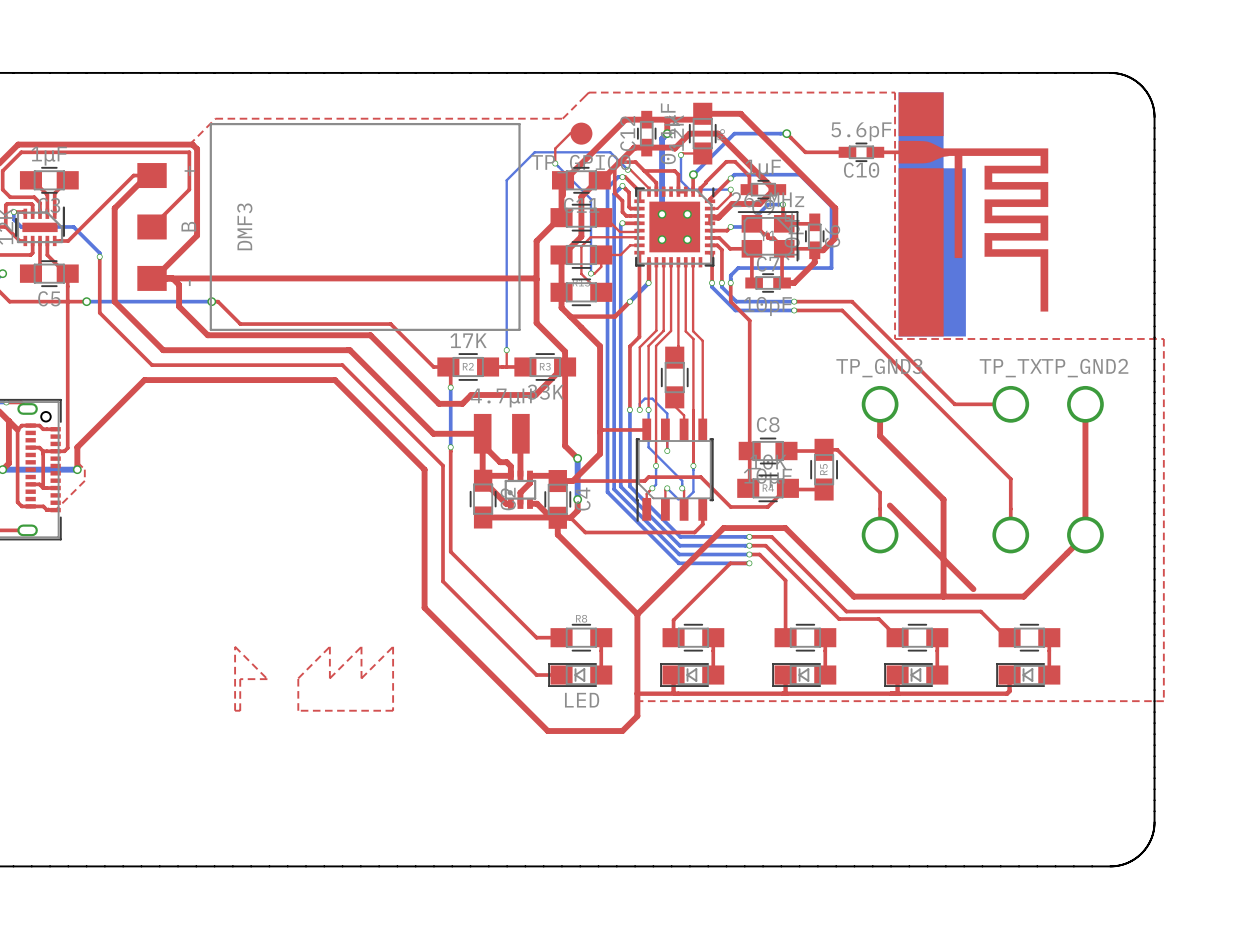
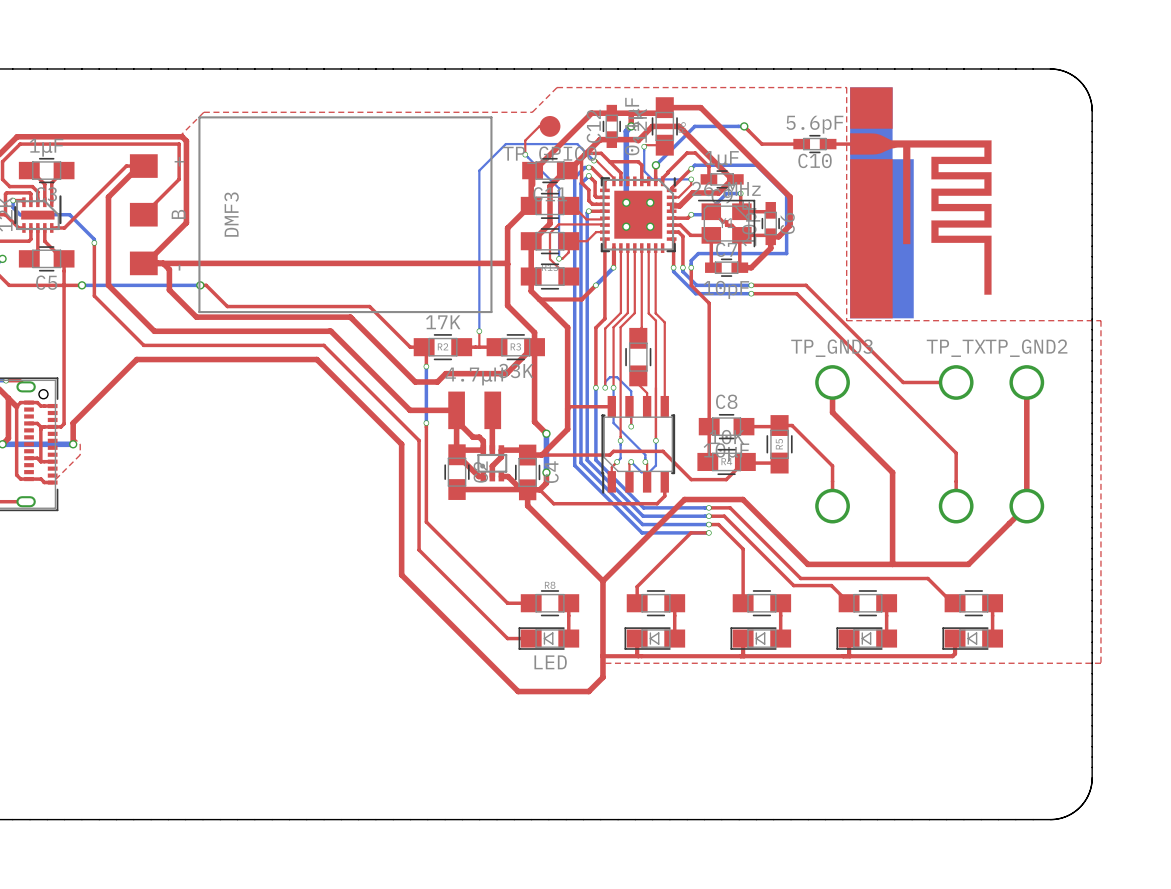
top track: (889, 505) (973, 589) -> none
top zone outline: (235, 646) (235, 710) (240, 710) (240, 679) (267, 679) (235, 646) -> none
top zone outline: (329, 646) (298, 678) (298, 710) (393, 710) (393, 646) (361, 678) (361, 646) (329, 678) (329, 646) -> none

